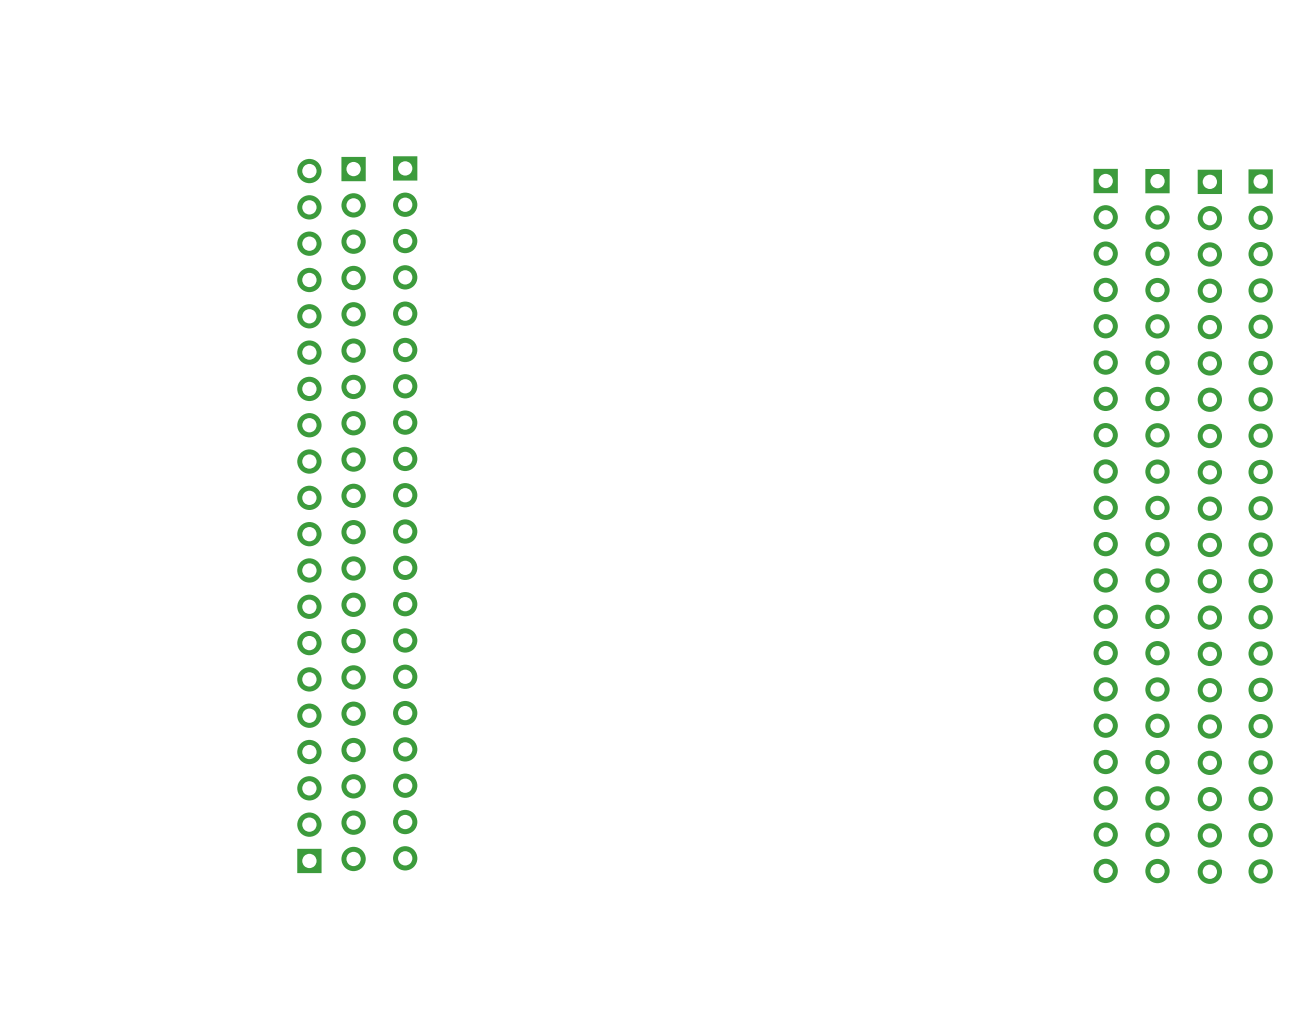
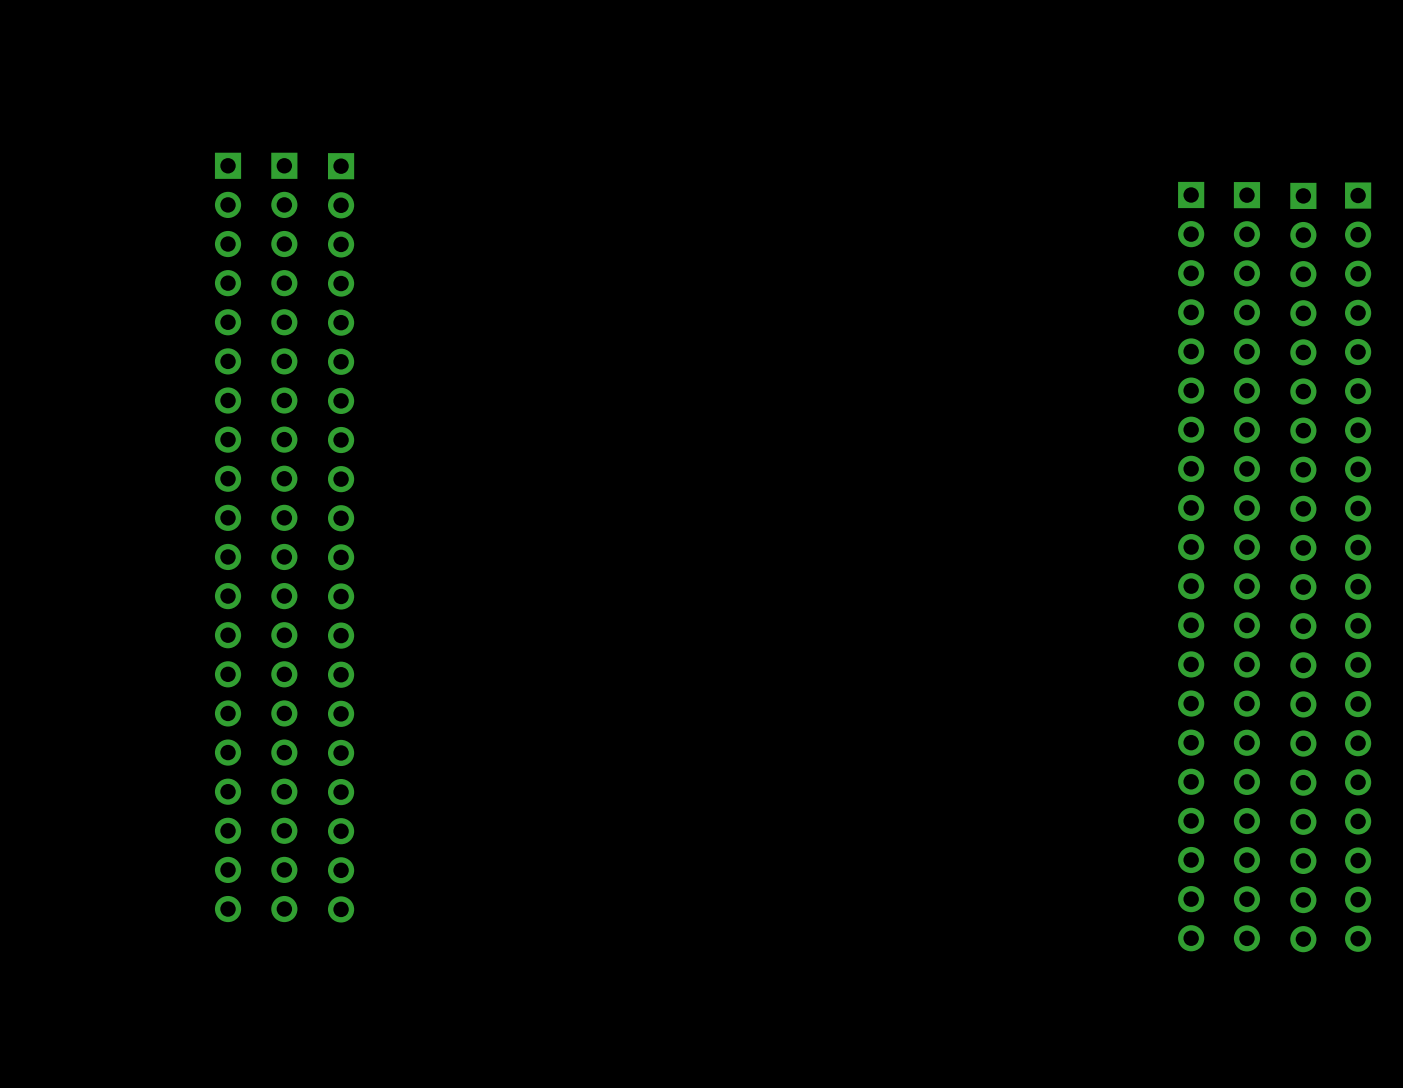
part: none -> (228, 537)
part: none -> (284, 537)
part: (405, 513) -> none
part: (353, 514) -> none
part rotation: 0° (309, 516) -> 180° (341, 537)

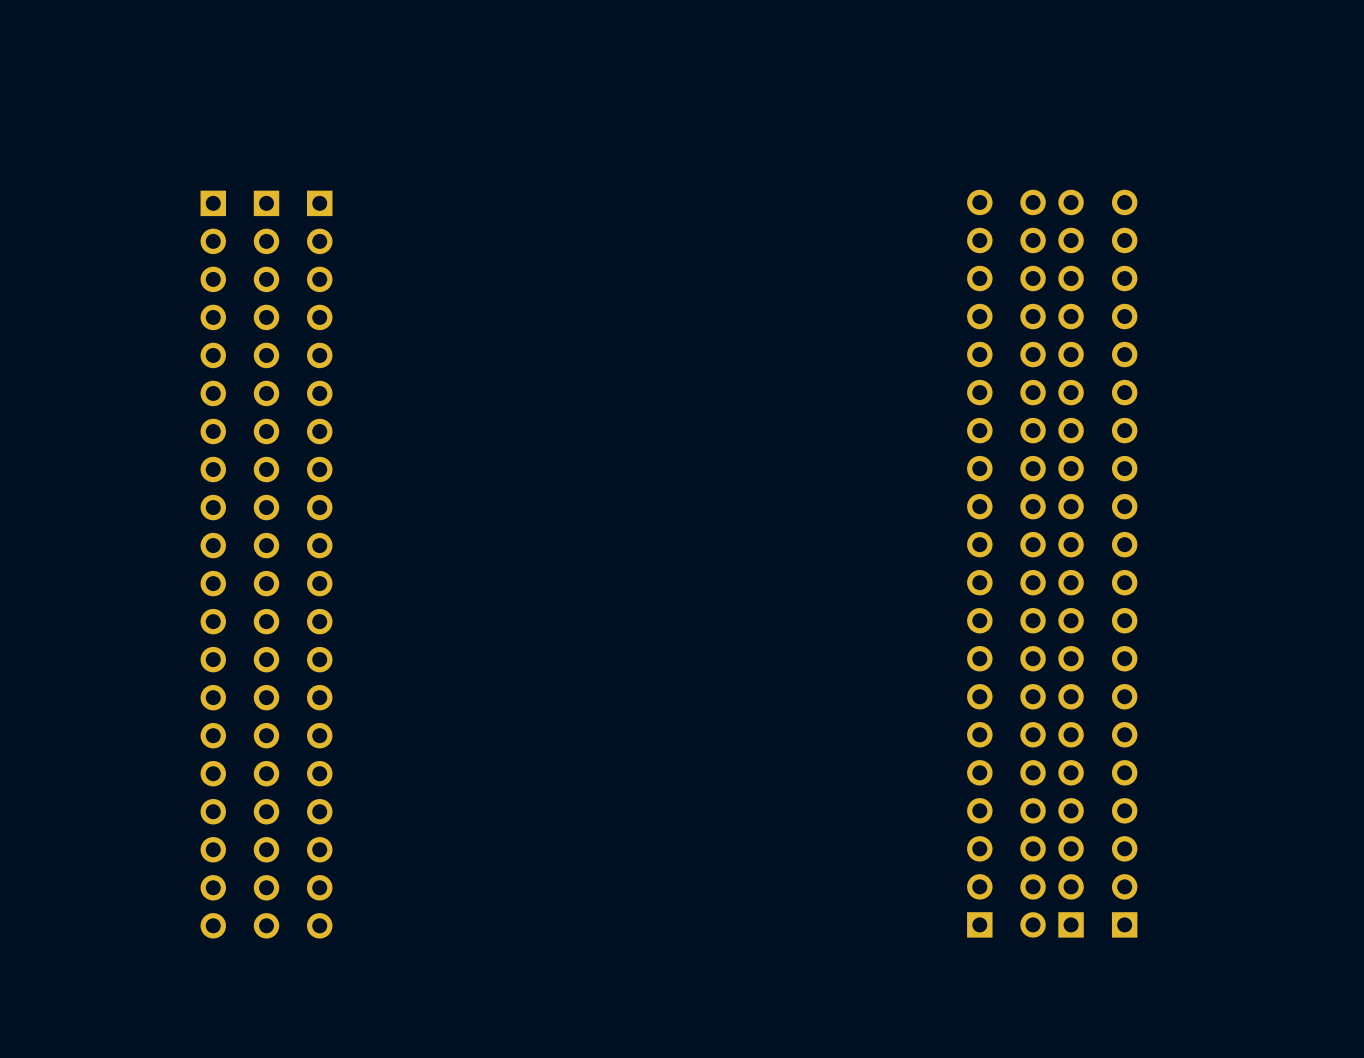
part: (228, 537) -> none
part: (284, 537) -> none
part: (341, 537) -> none
part rotation: 0° (1191, 566) -> 180° (1124, 563)
part: (1246, 566) -> none
part: (1303, 567) -> none
part: (1358, 567) -> none
part: none -> (979, 563)
part: none -> (1052, 563)
part: none -> (213, 564)
part: none -> (266, 564)
part: none -> (319, 564)

